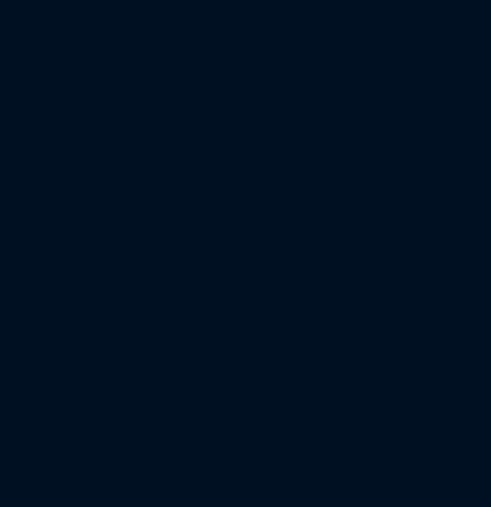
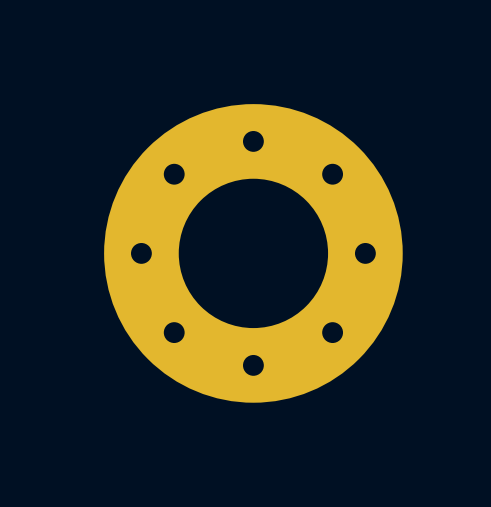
part: none -> (253, 253)

